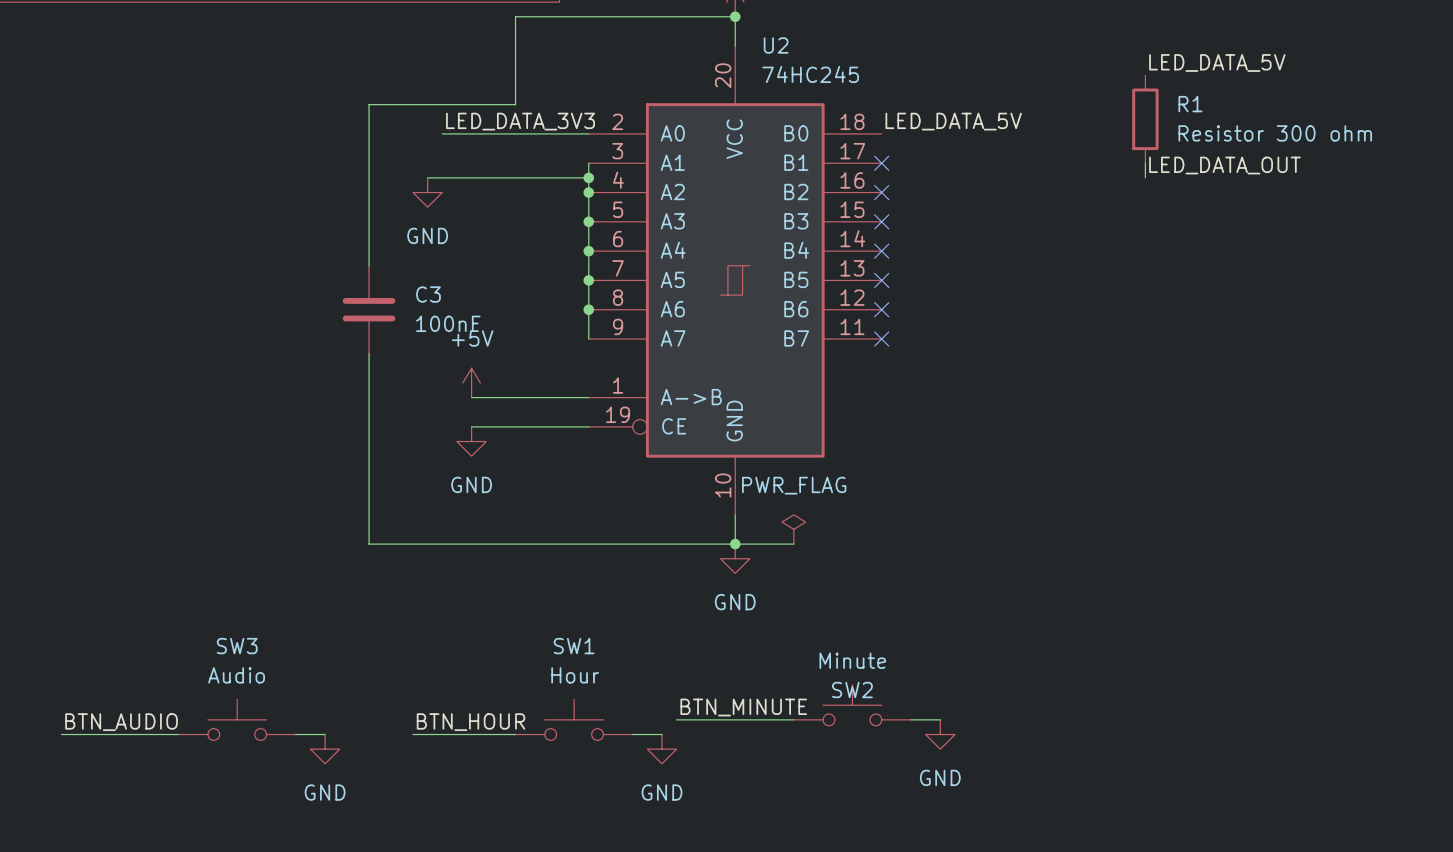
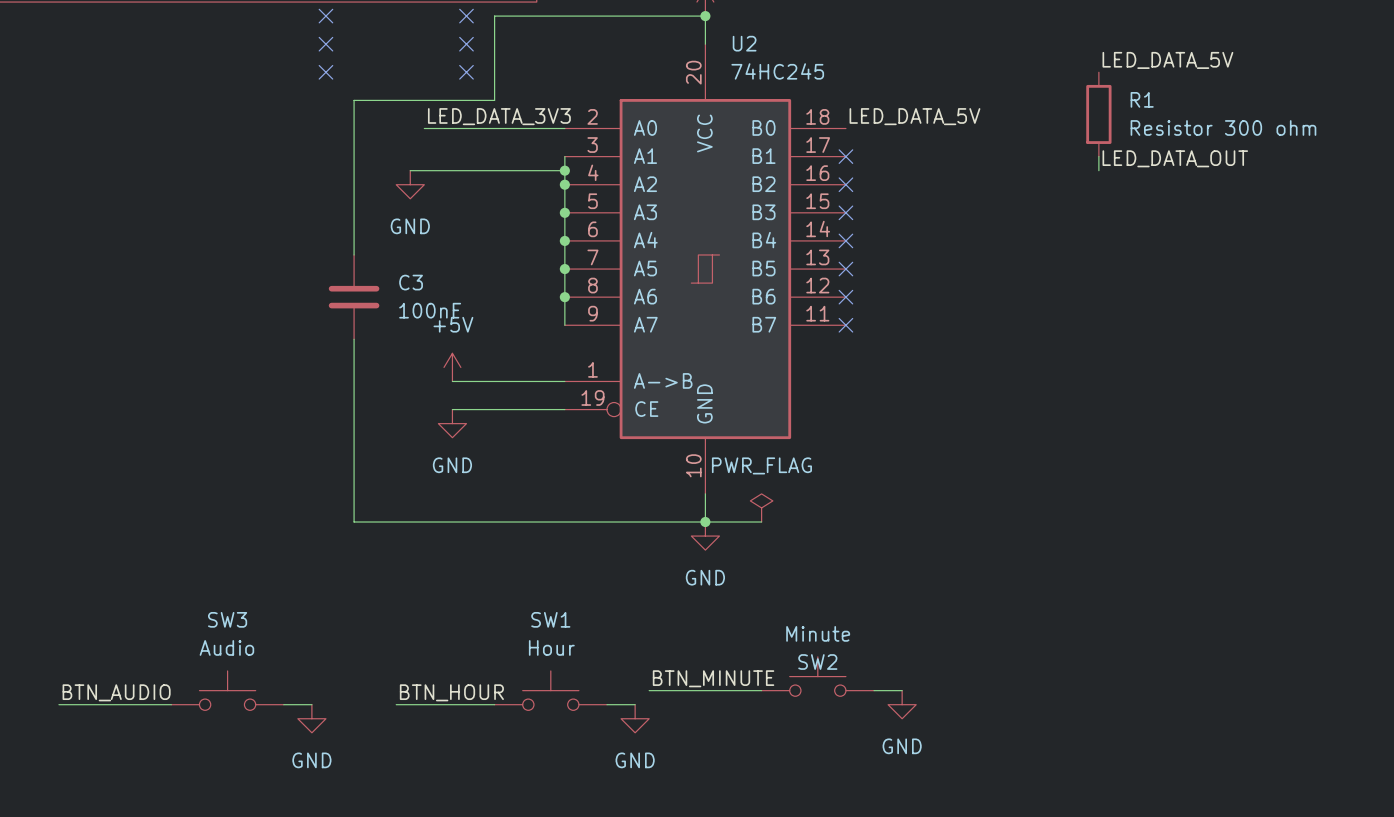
no-connect mark: none -> (325, 16)
no-connect mark: none -> (466, 16)
no-connect mark: none -> (325, 44)
no-connect mark: none -> (466, 44)
no-connect mark: none -> (325, 72)
no-connect mark: none -> (466, 72)

